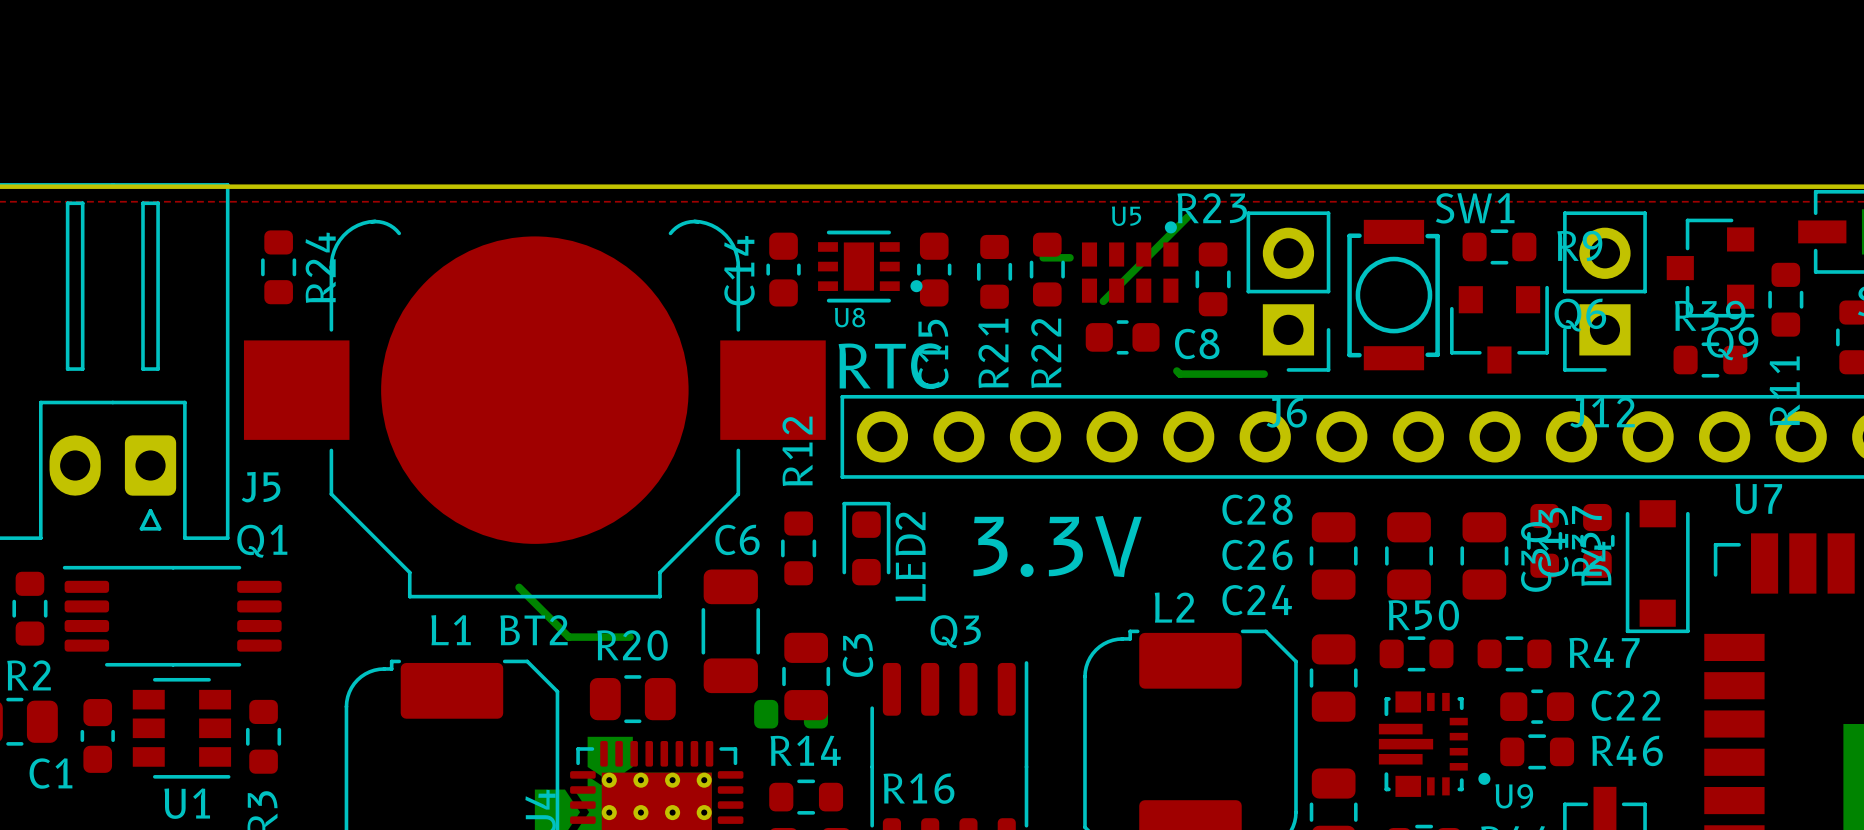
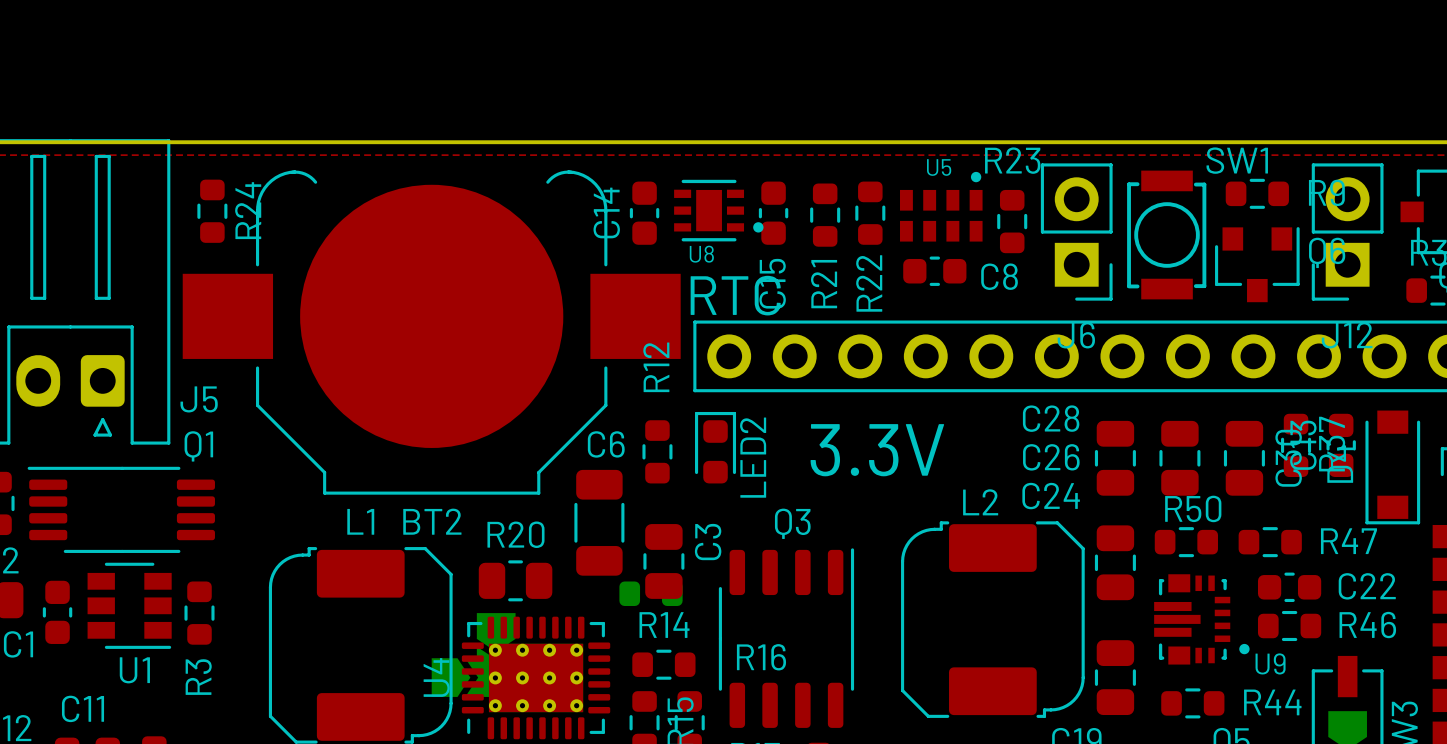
bottom track: (1187, 217) (1103, 301) -> none
bottom track: (1043, 257) (1070, 257) -> none
bottom track: (1176, 371) (1179, 374) (1264, 374) -> none
bottom track: (519, 587) (568, 637) (630, 637) -> none

